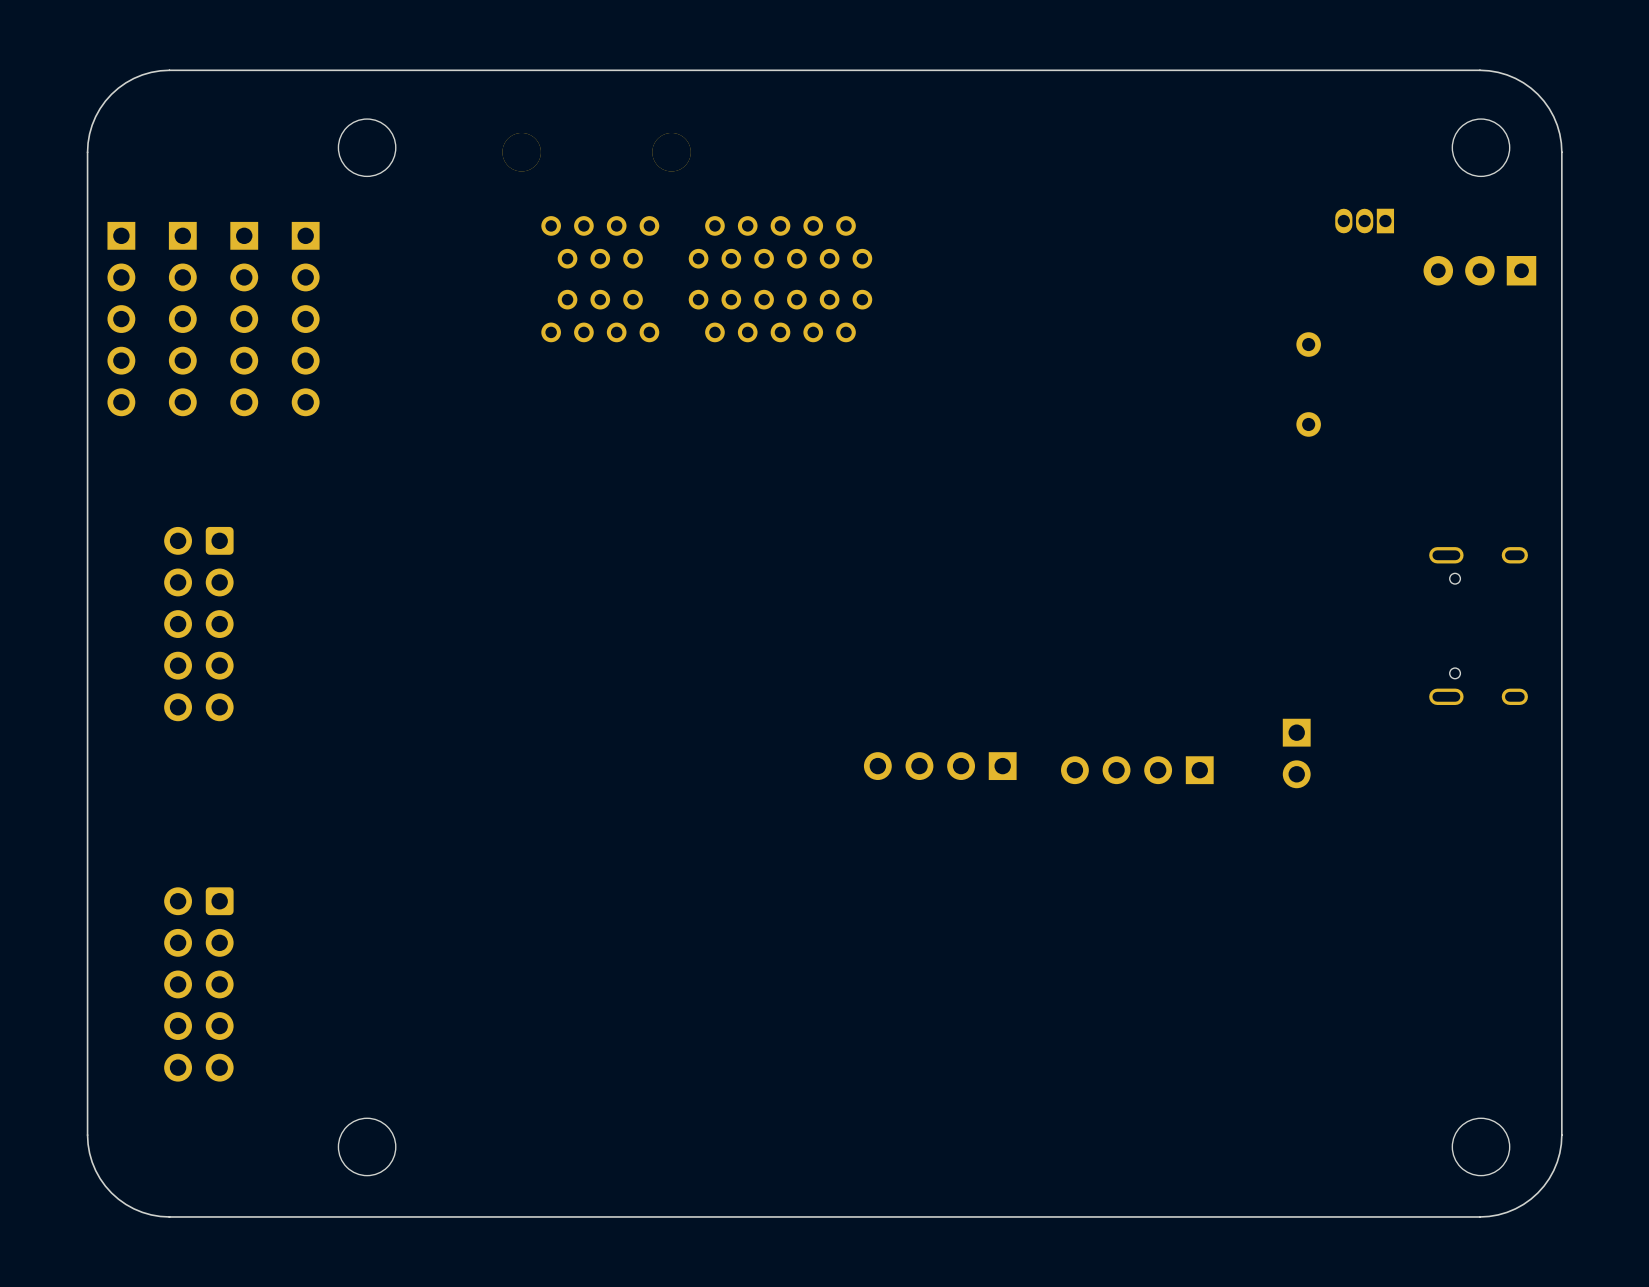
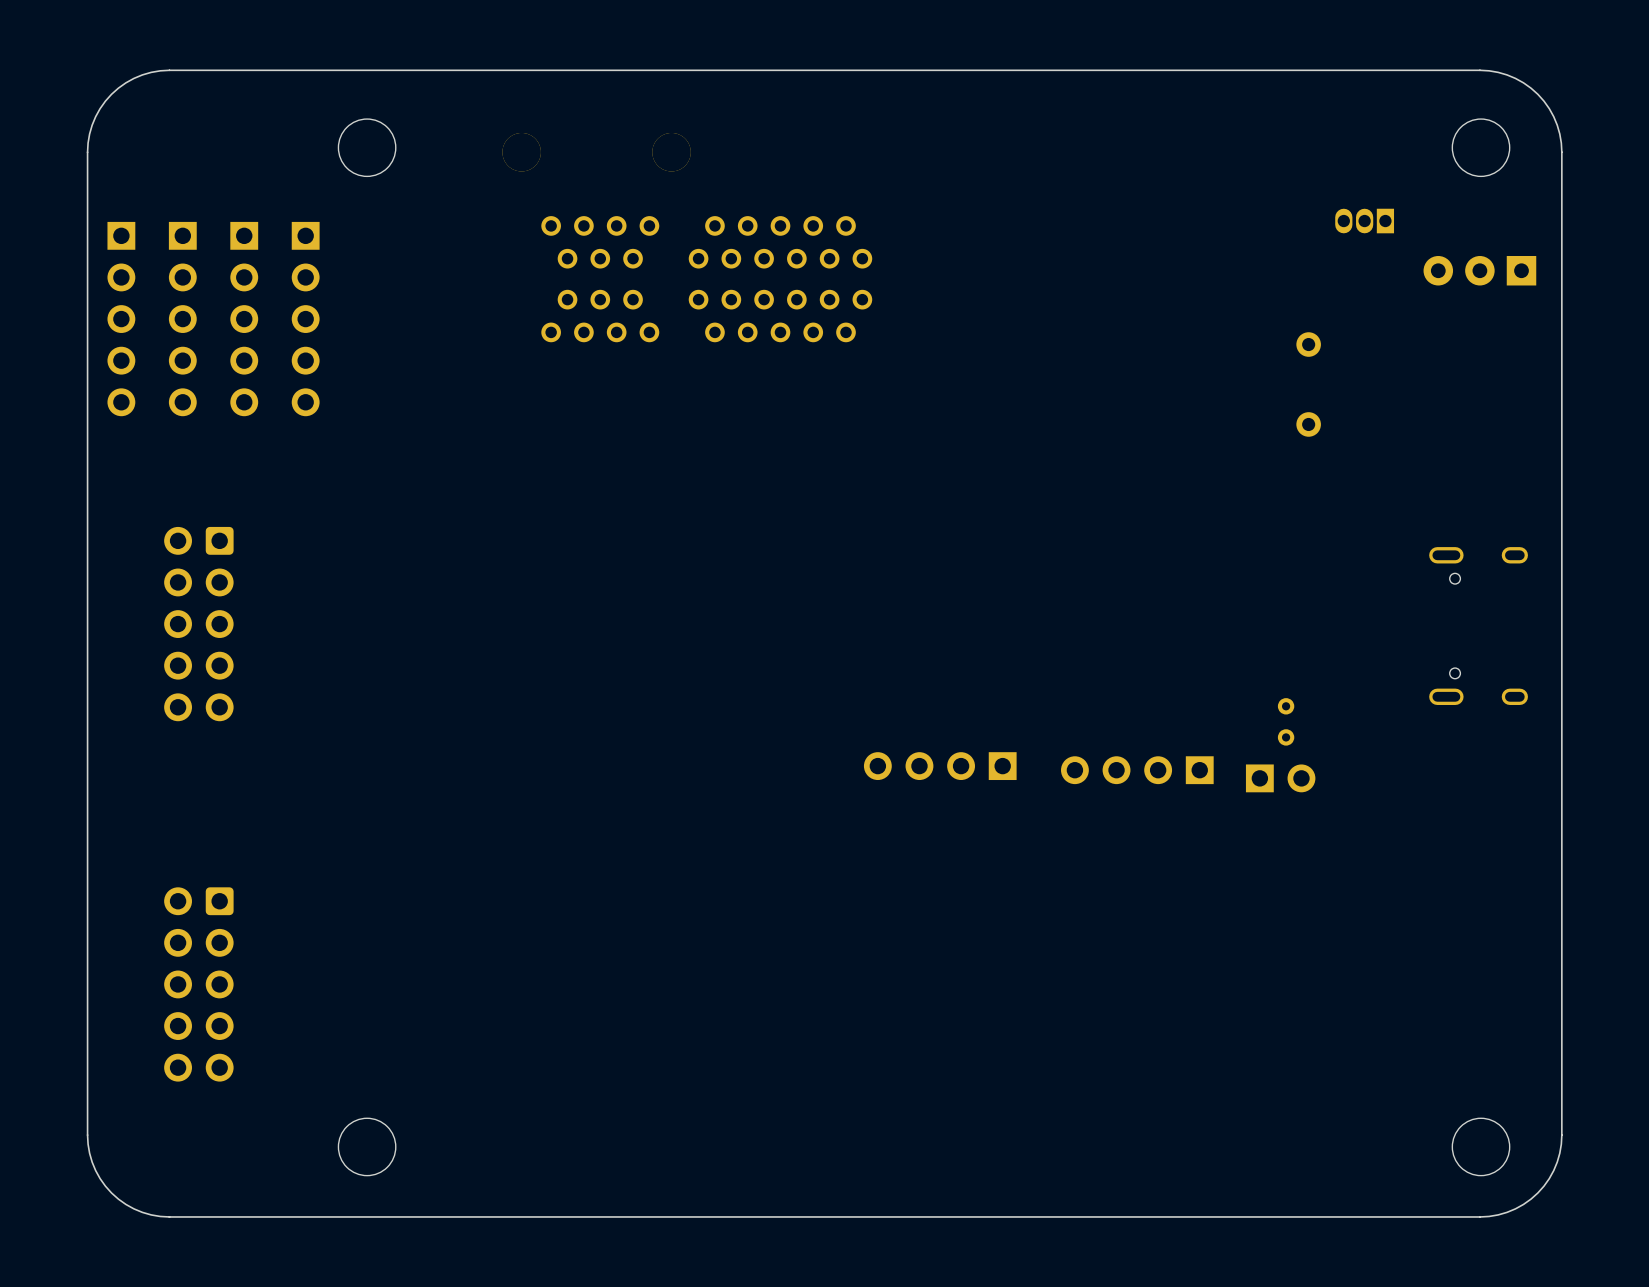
part: none -> (1286, 721)
part rotation: 0° (1296, 753) -> 90° counterclockwise (1280, 778)

